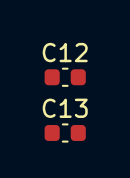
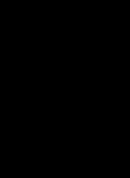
C12: (65, 77) -> none
C13: (65, 132) -> none

